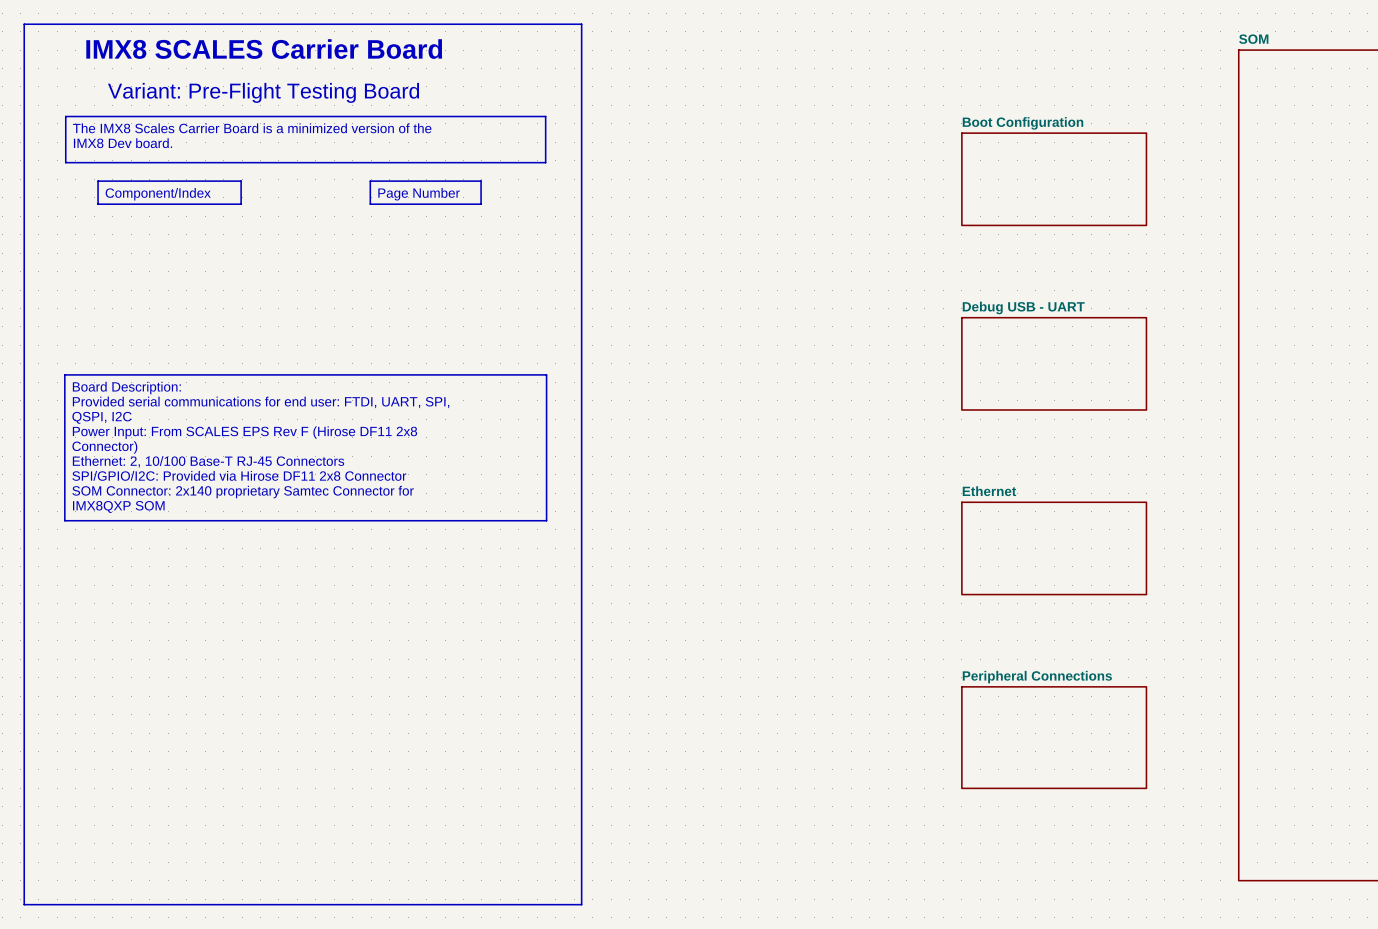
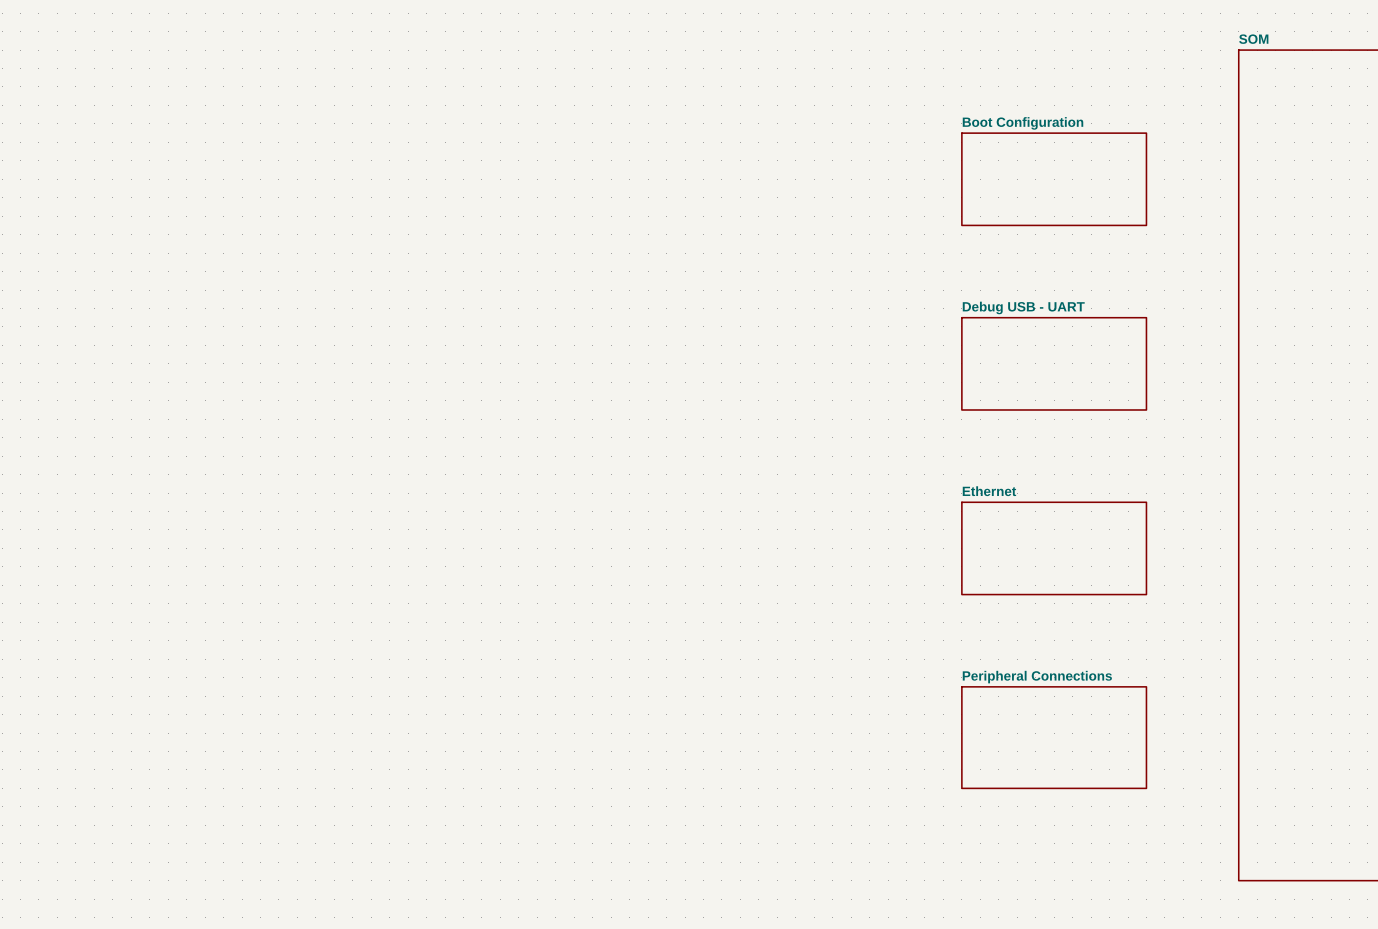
line: (24, 24) (581, 24) (581, 904) (24, 904) (24, 24) -> none
text: IMX8 SCALES Carrier Board (264, 49) -> none
text: Variant: Pre-Flight Testing Board (263, 92) -> none
line: (65, 116) (545, 116) (545, 162) (65, 162) (65, 116) -> none
text: The IMX8 Scales Carrier Board is a minimized version of the (252, 128) -> none
text: IMX8 Dev board. (123, 143) -> none
line: (98, 181) (241, 181) (241, 204) (98, 204) (98, 181) -> none
line: (370, 181) (481, 181) (481, 204) (370, 204) (370, 181) -> none
text: Component/Index (158, 194) -> none
text: Page Number (419, 194) -> none
line: (64, 374) (546, 374) (546, 520) (64, 520) (64, 374) -> none
text: Board Description: (126, 388) -> none
text: Provided serial communications for end user: FTDI, UART, SPI, (261, 402) -> none
text: QSPI, I2C (102, 417) -> none
text: Power Input: From SCALES EPS Rev F (Hirose DF11 2x8 (244, 432) -> none
text: Connector) (104, 447) -> none
text: Ethernet: 2, 10/100 Base-T RJ-45 Connectors (208, 461) -> none
text: SPI/GPIO/I2C: Provided via Hirose DF11 2x8 Connector (239, 475) -> none
text: SOM Connector: 2x140 proprietary Samtec Connector for (243, 492) -> none
text: IMX8QXP SOM (118, 506) -> none

